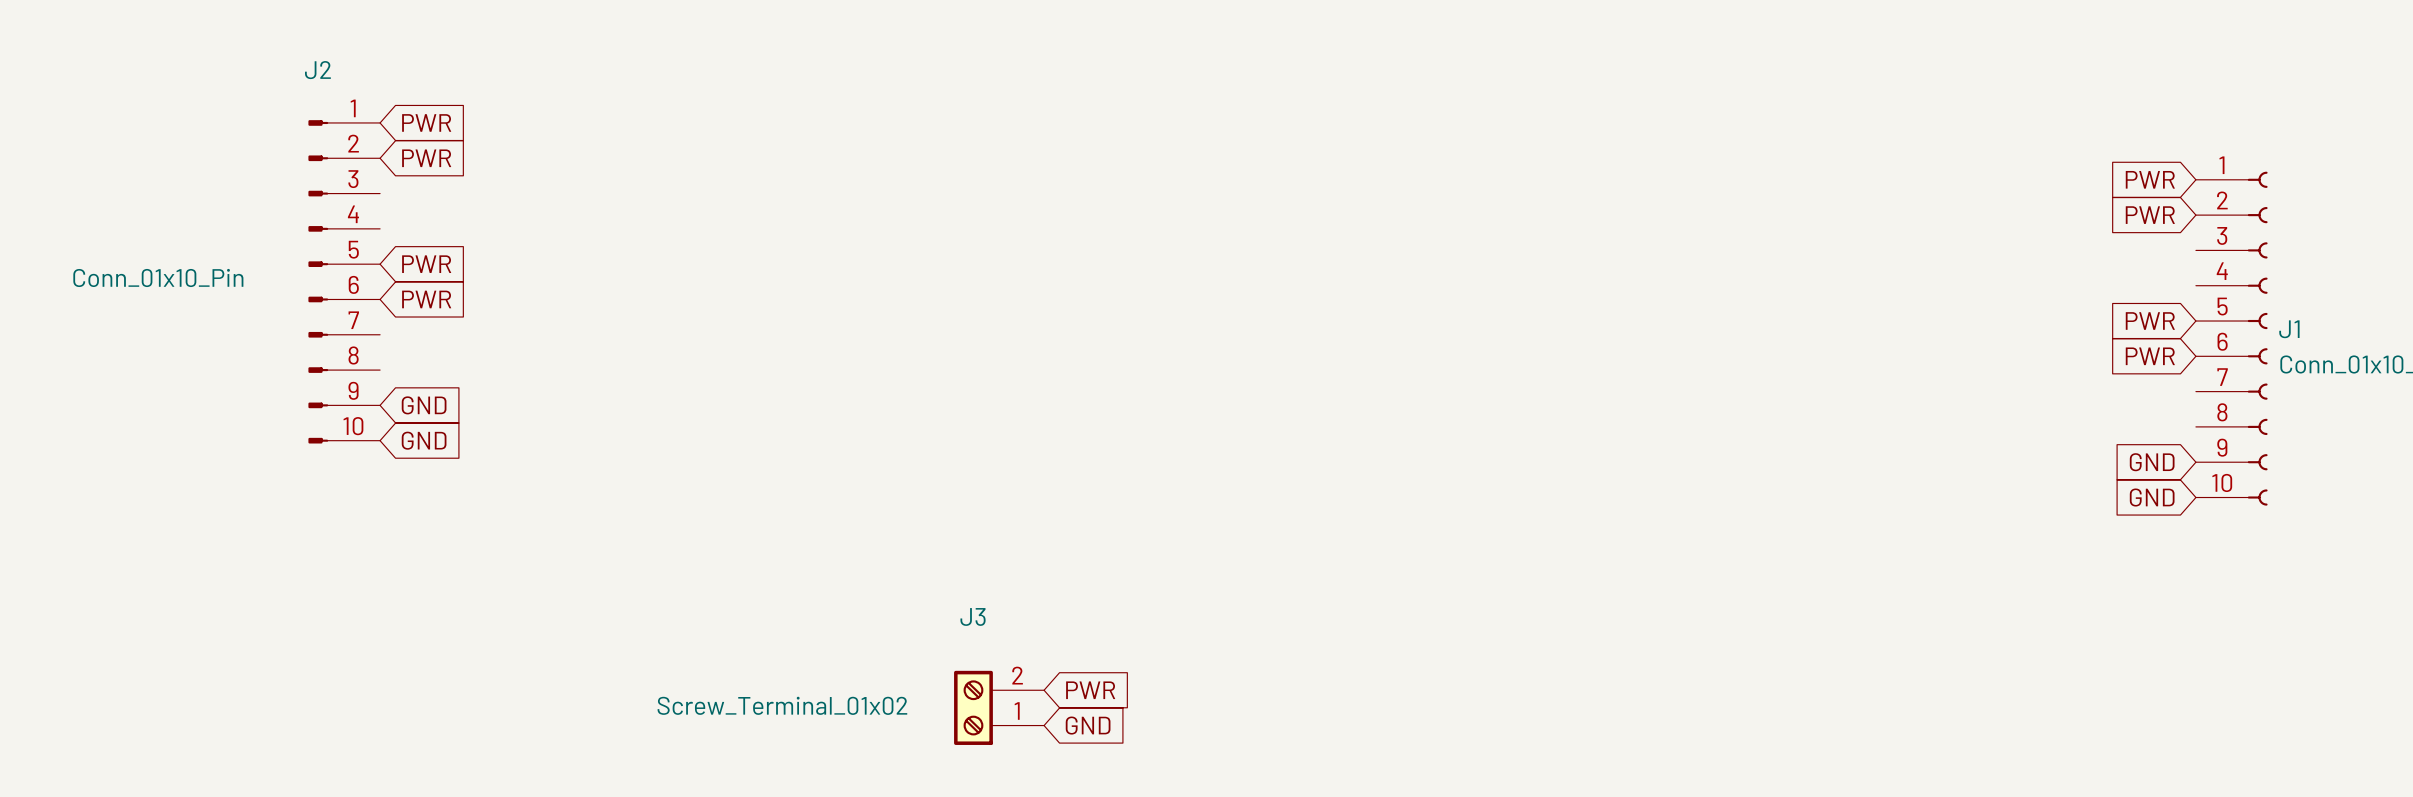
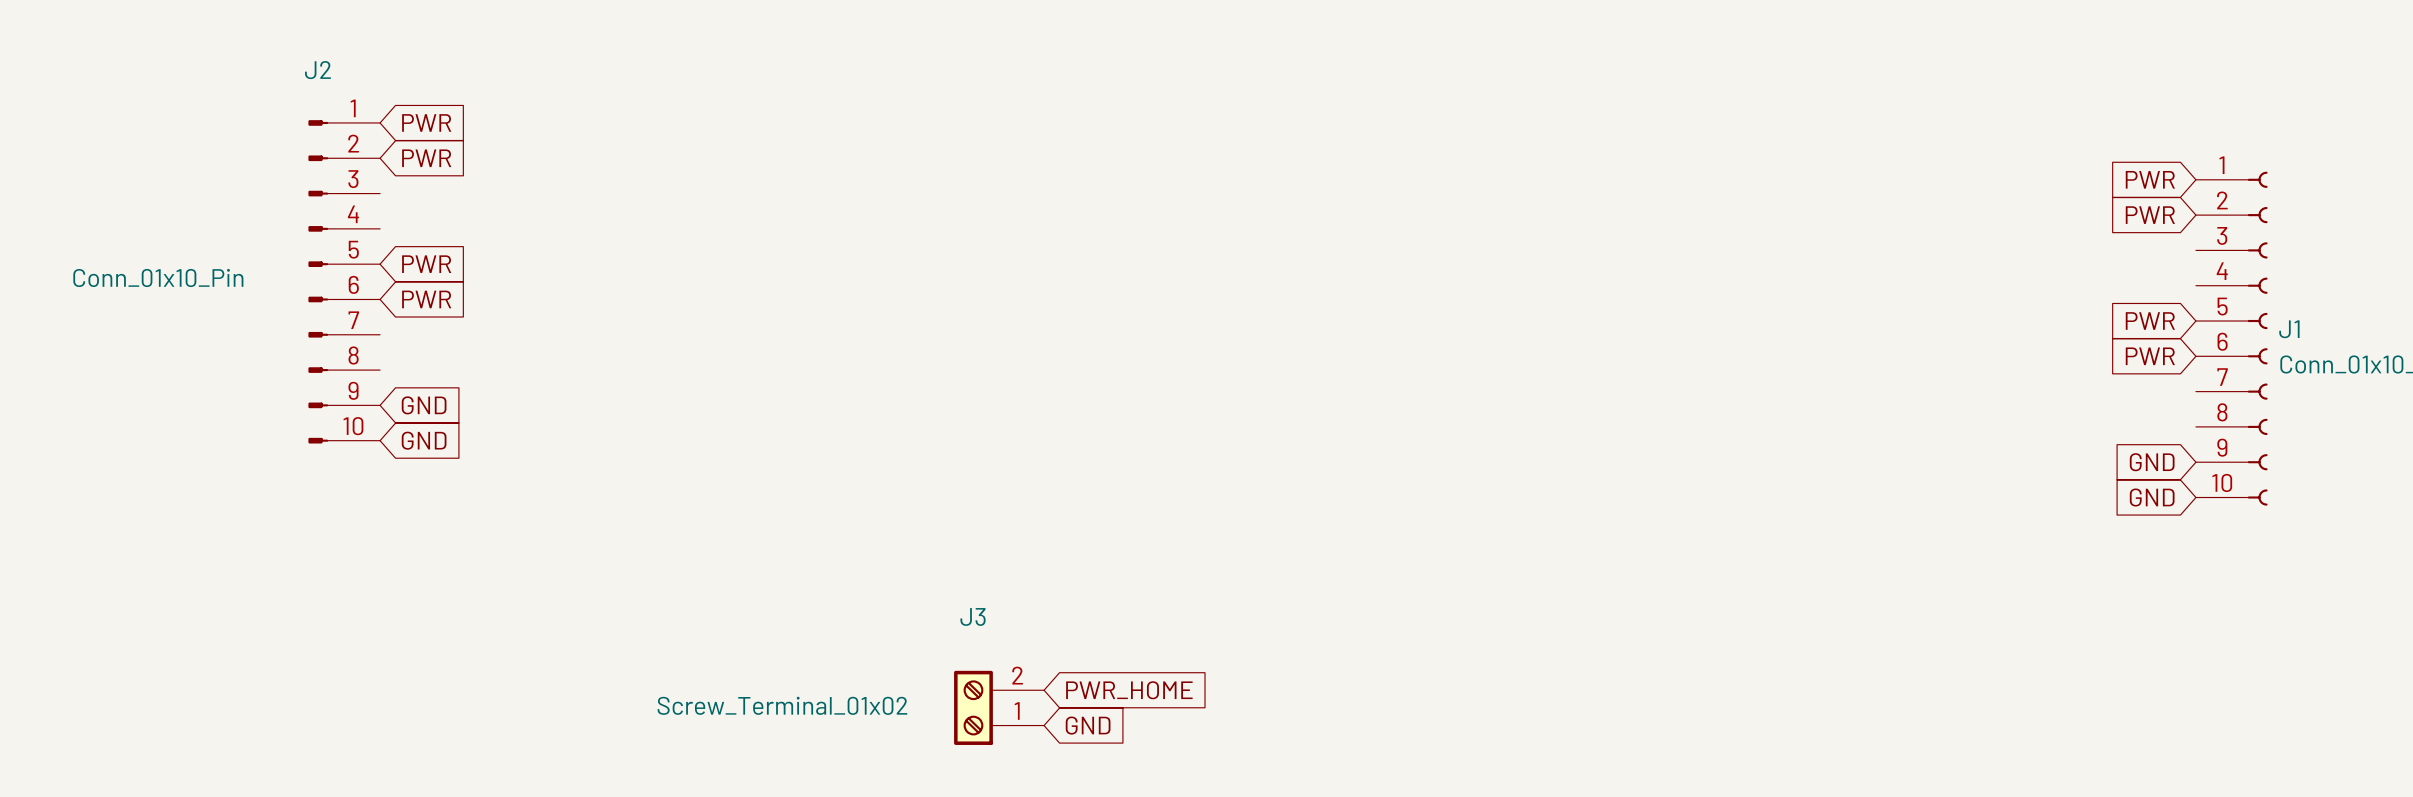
global label: PWR (1090, 690) -> PWR_HOME (1129, 690)

